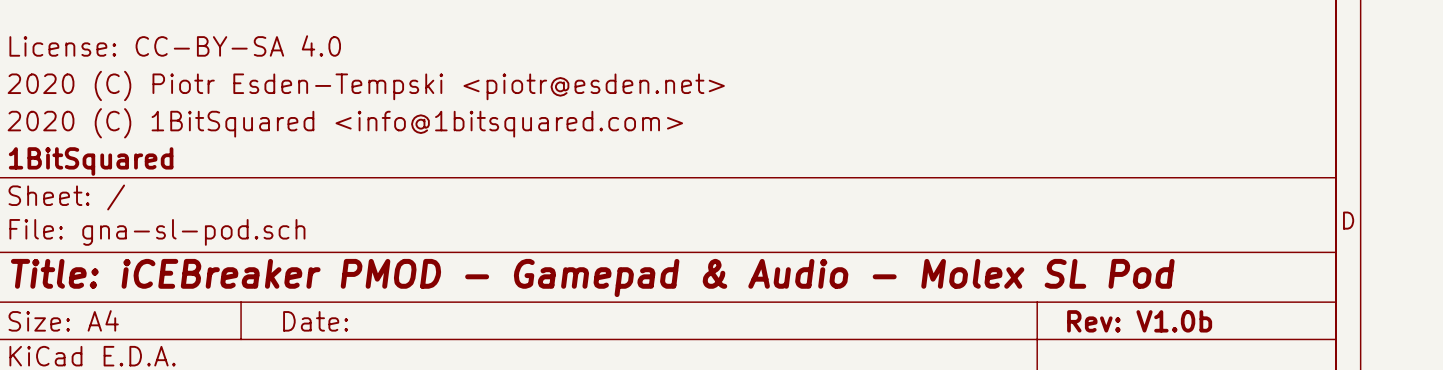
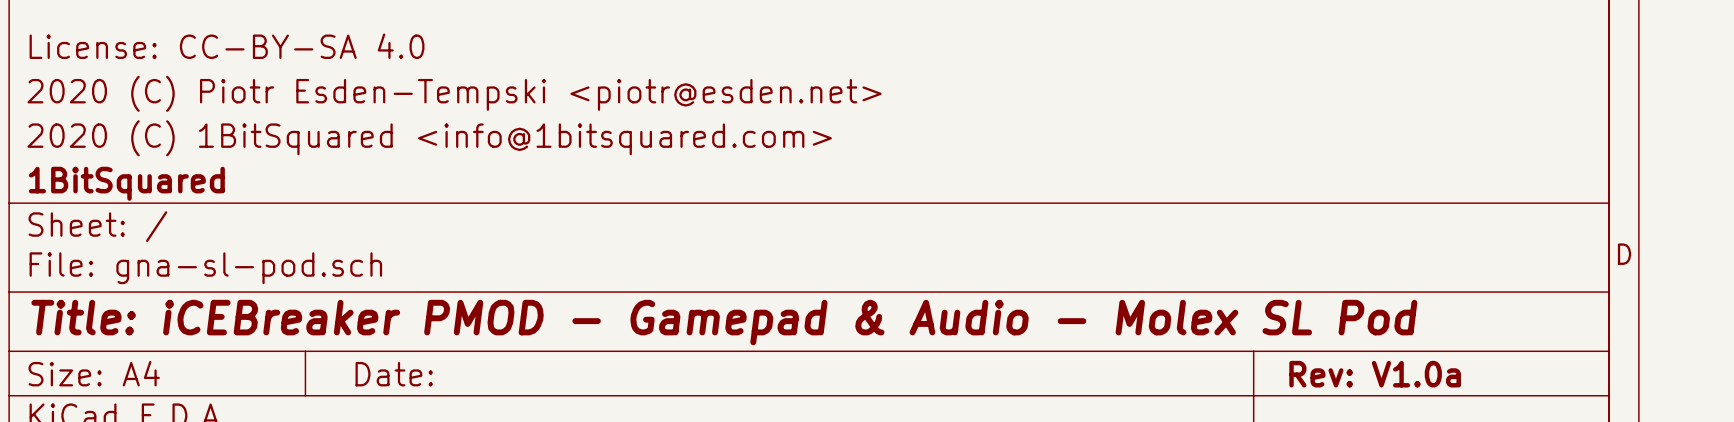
title block: Rev: V1.0b (1139, 321) -> Rev: V1.0a (1375, 374)

